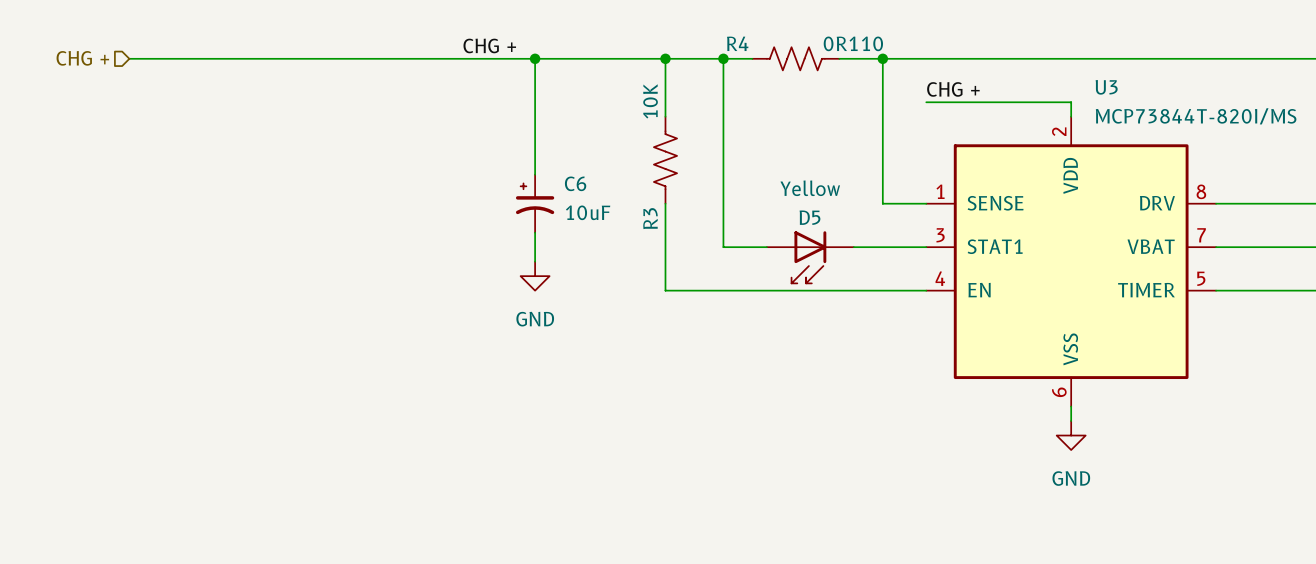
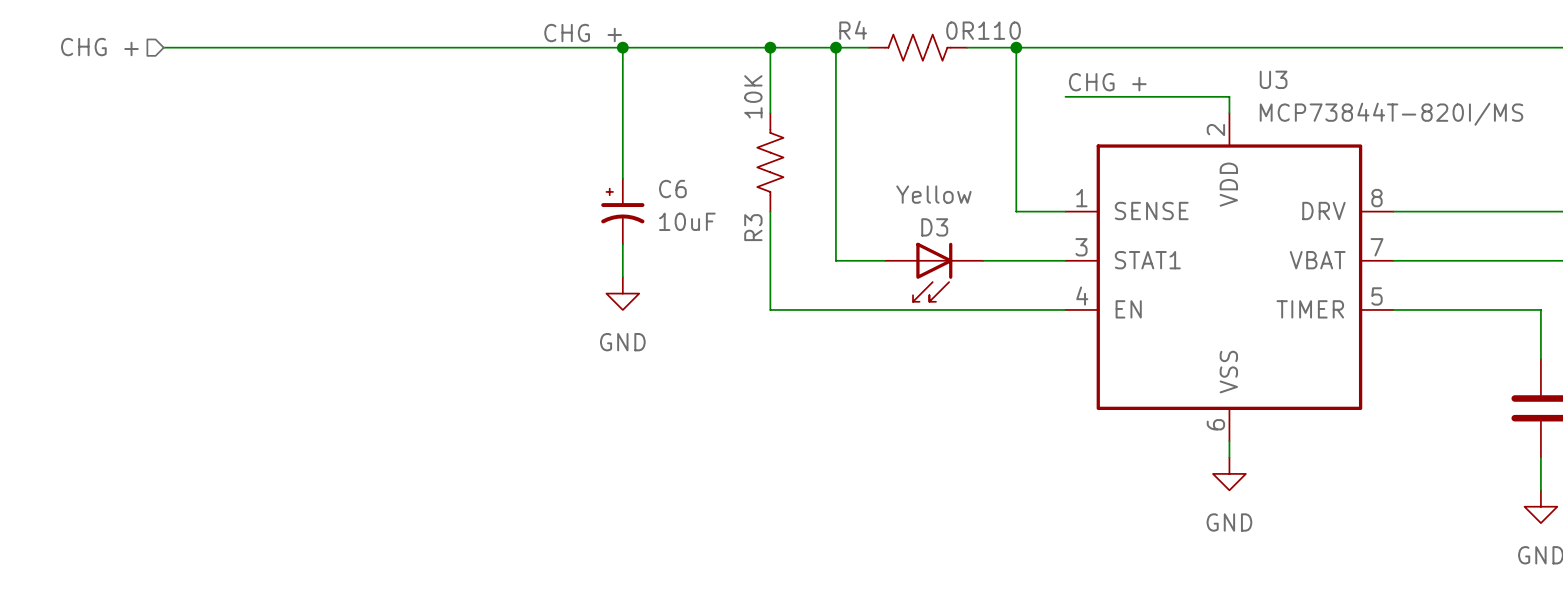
D5 name: D5 (809, 217) -> D3 (934, 227)

